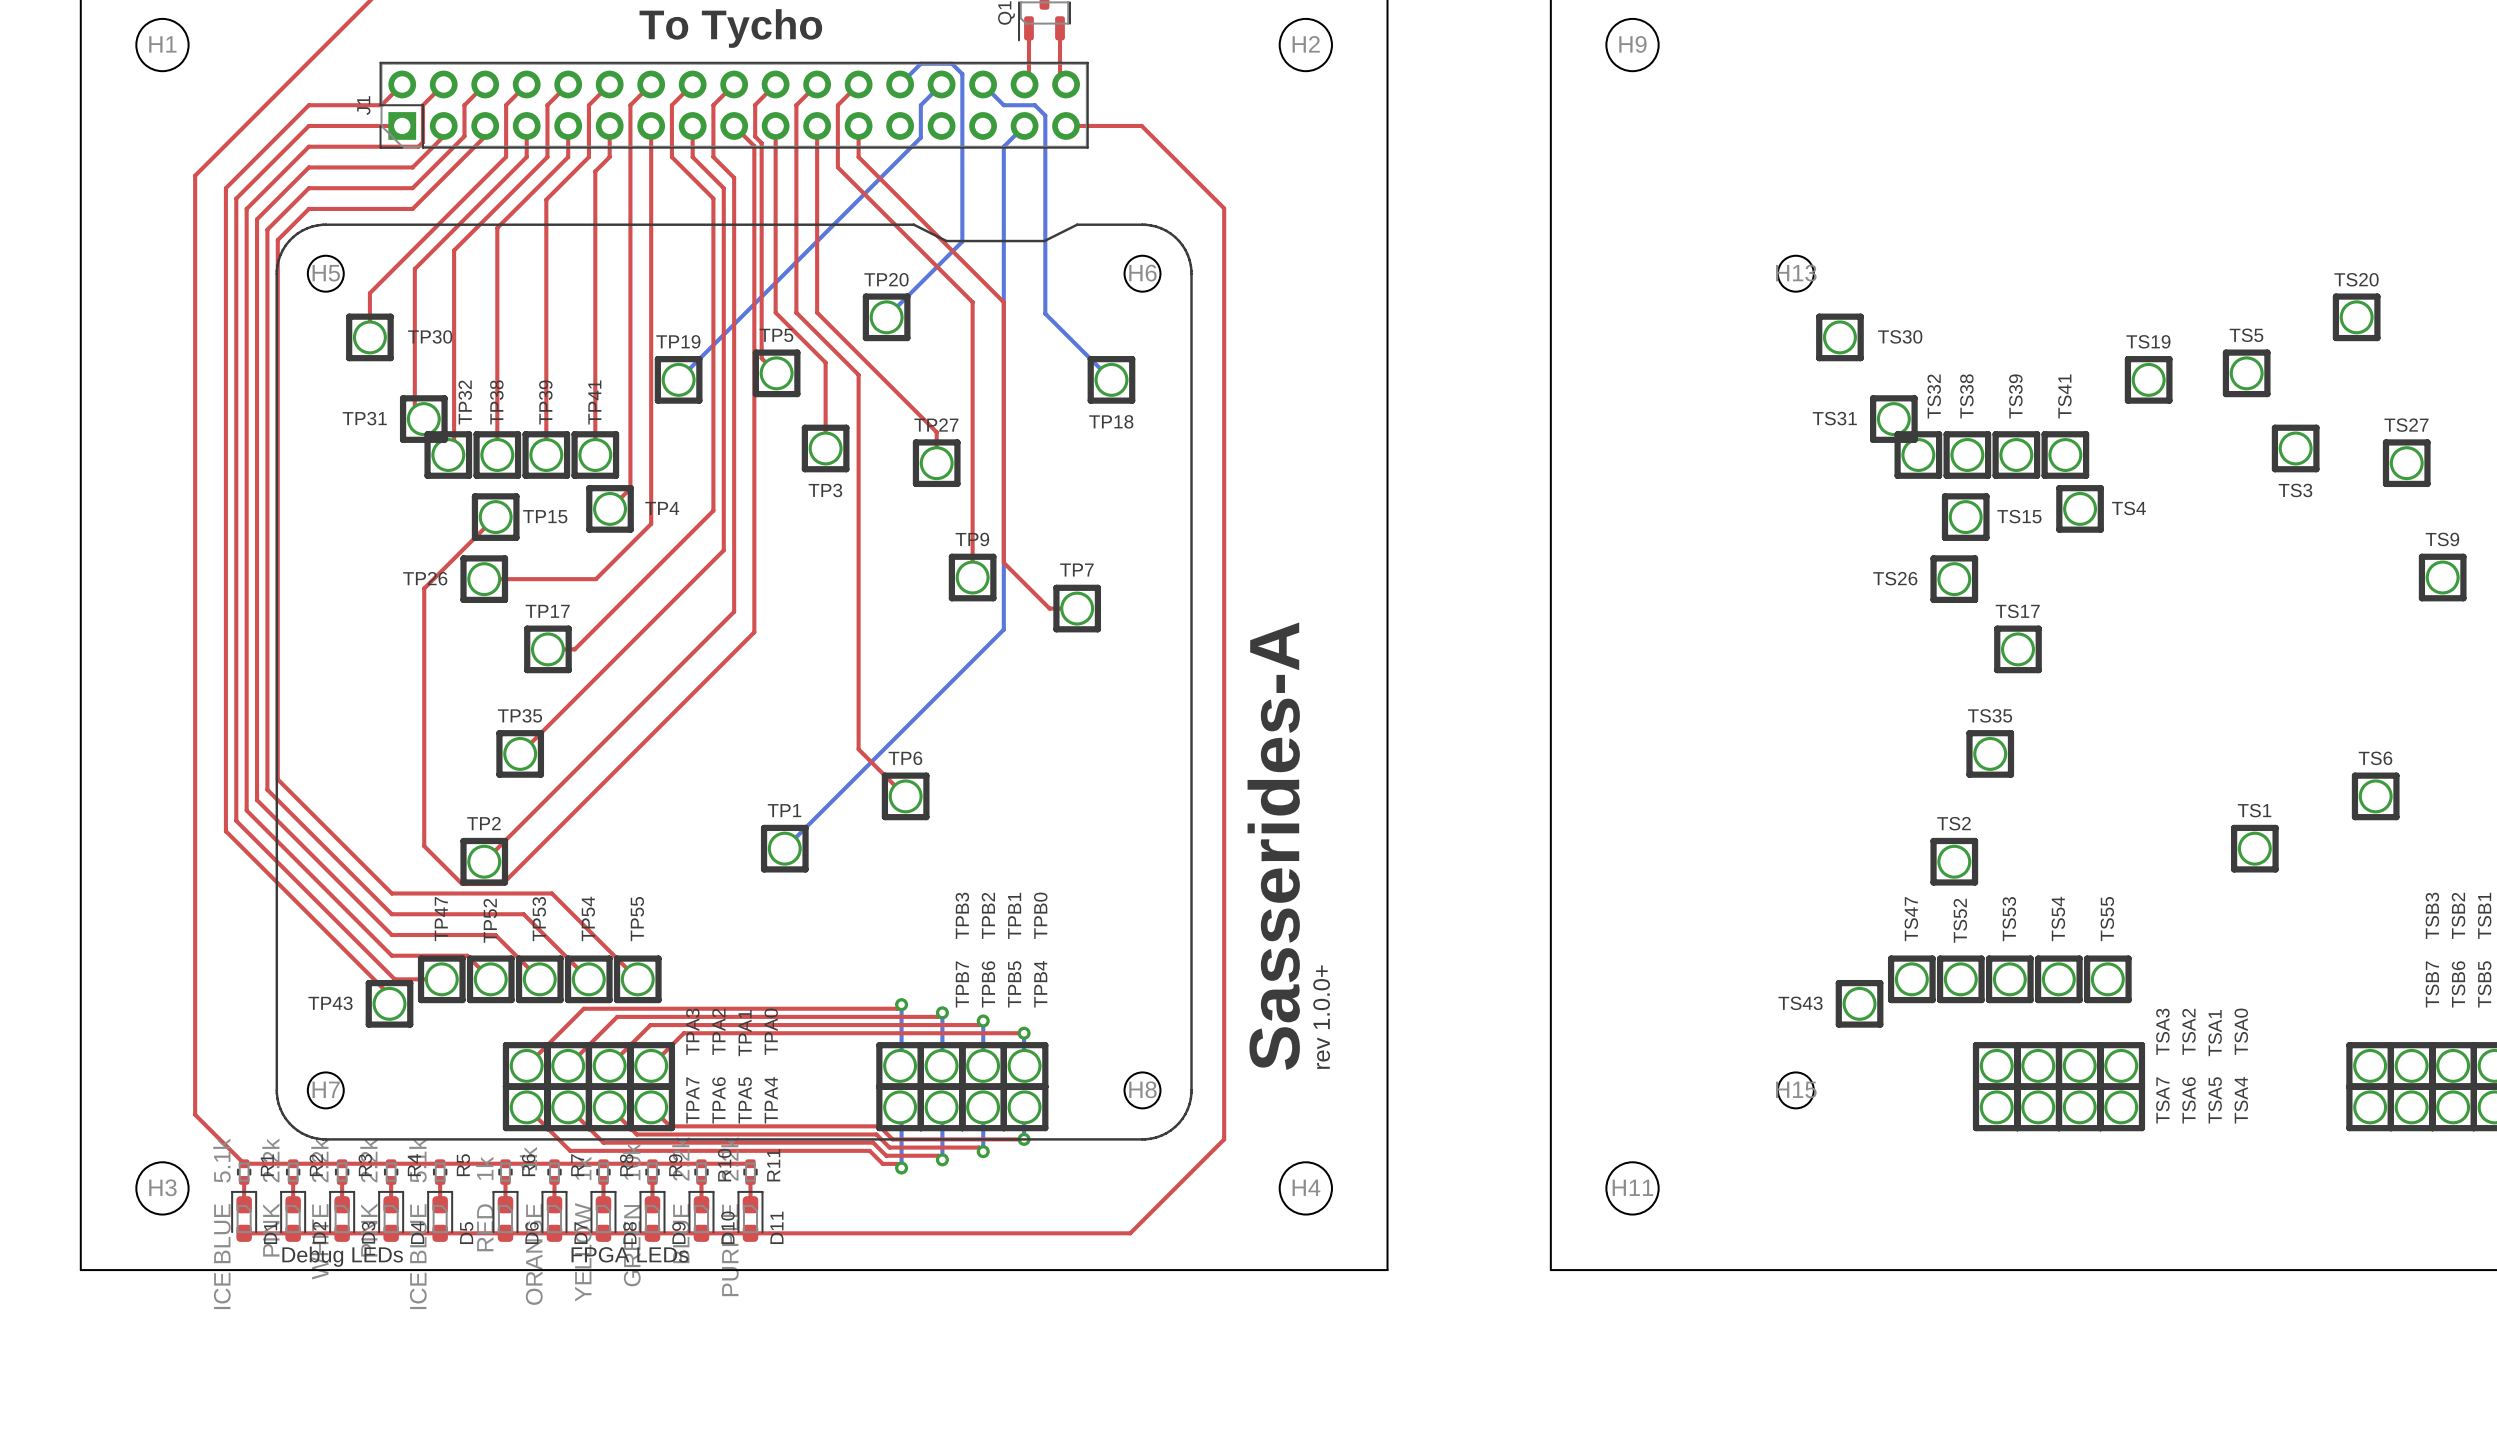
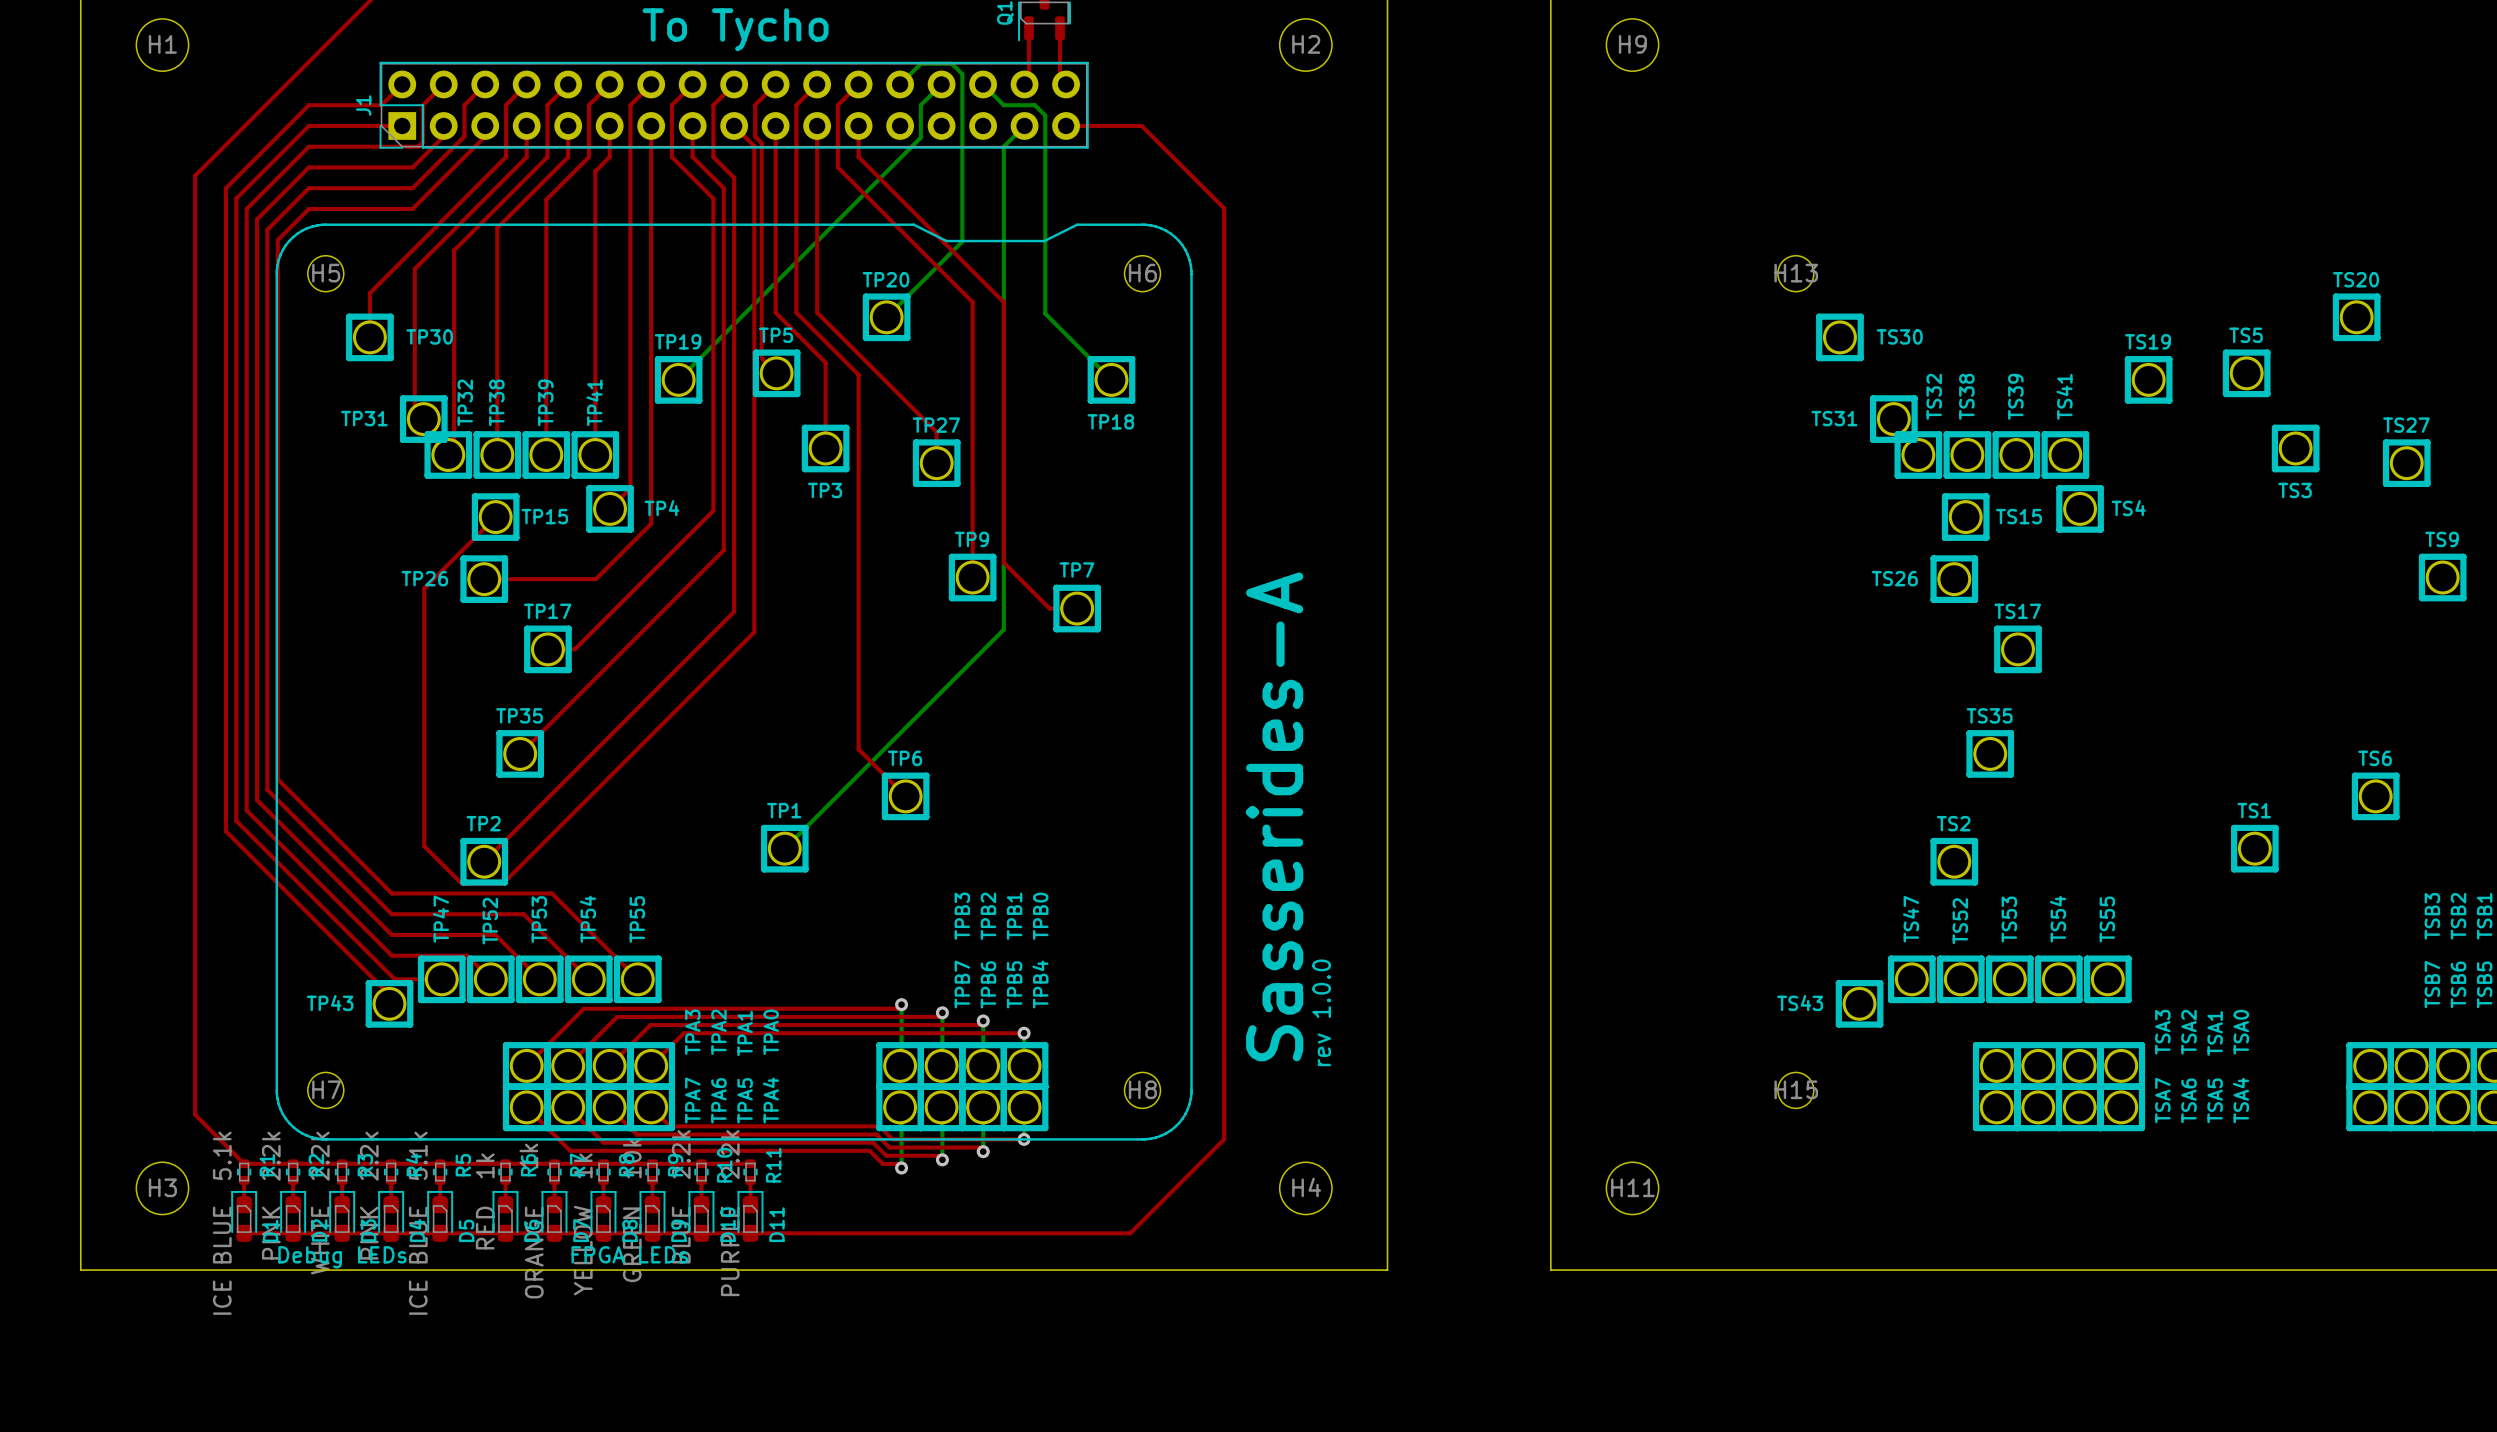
text: rev 1.0.0+ (1321, 1017) -> rev 1.0.0 (1321, 1012)

